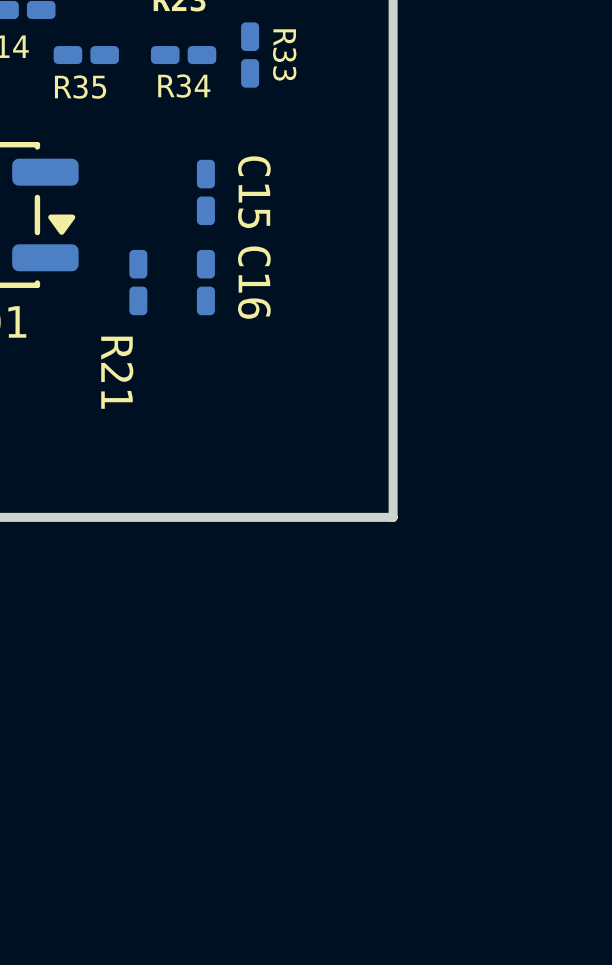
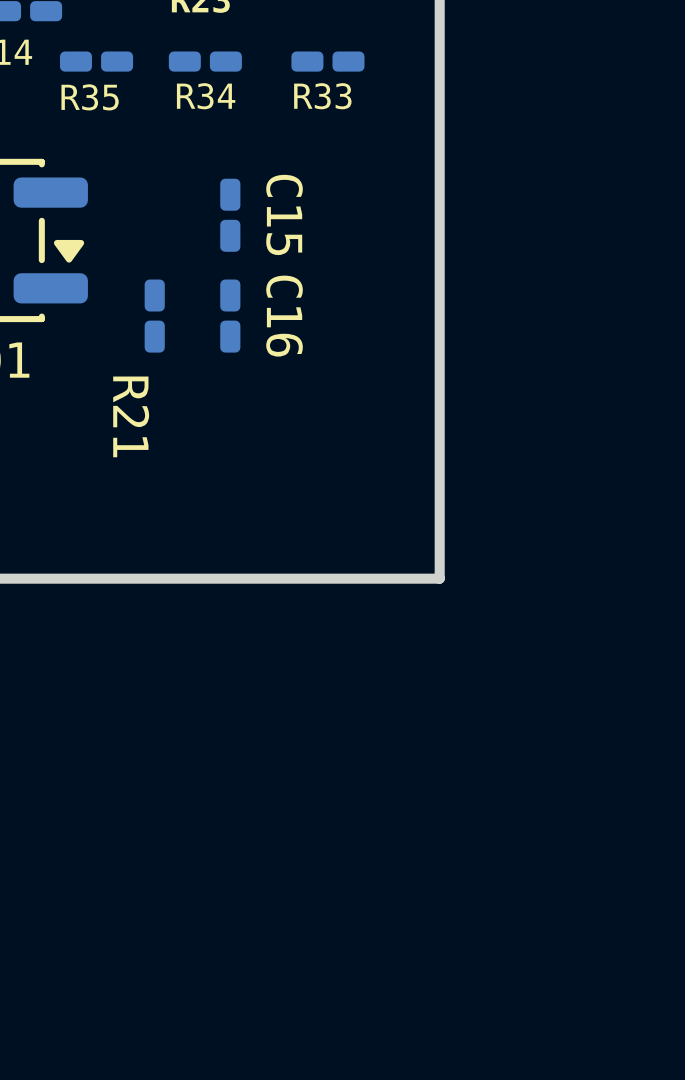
R33 rotation: 0° (250, 55) -> 90° clockwise (327, 61)
R33 position: (250, 55) -> (327, 61)

